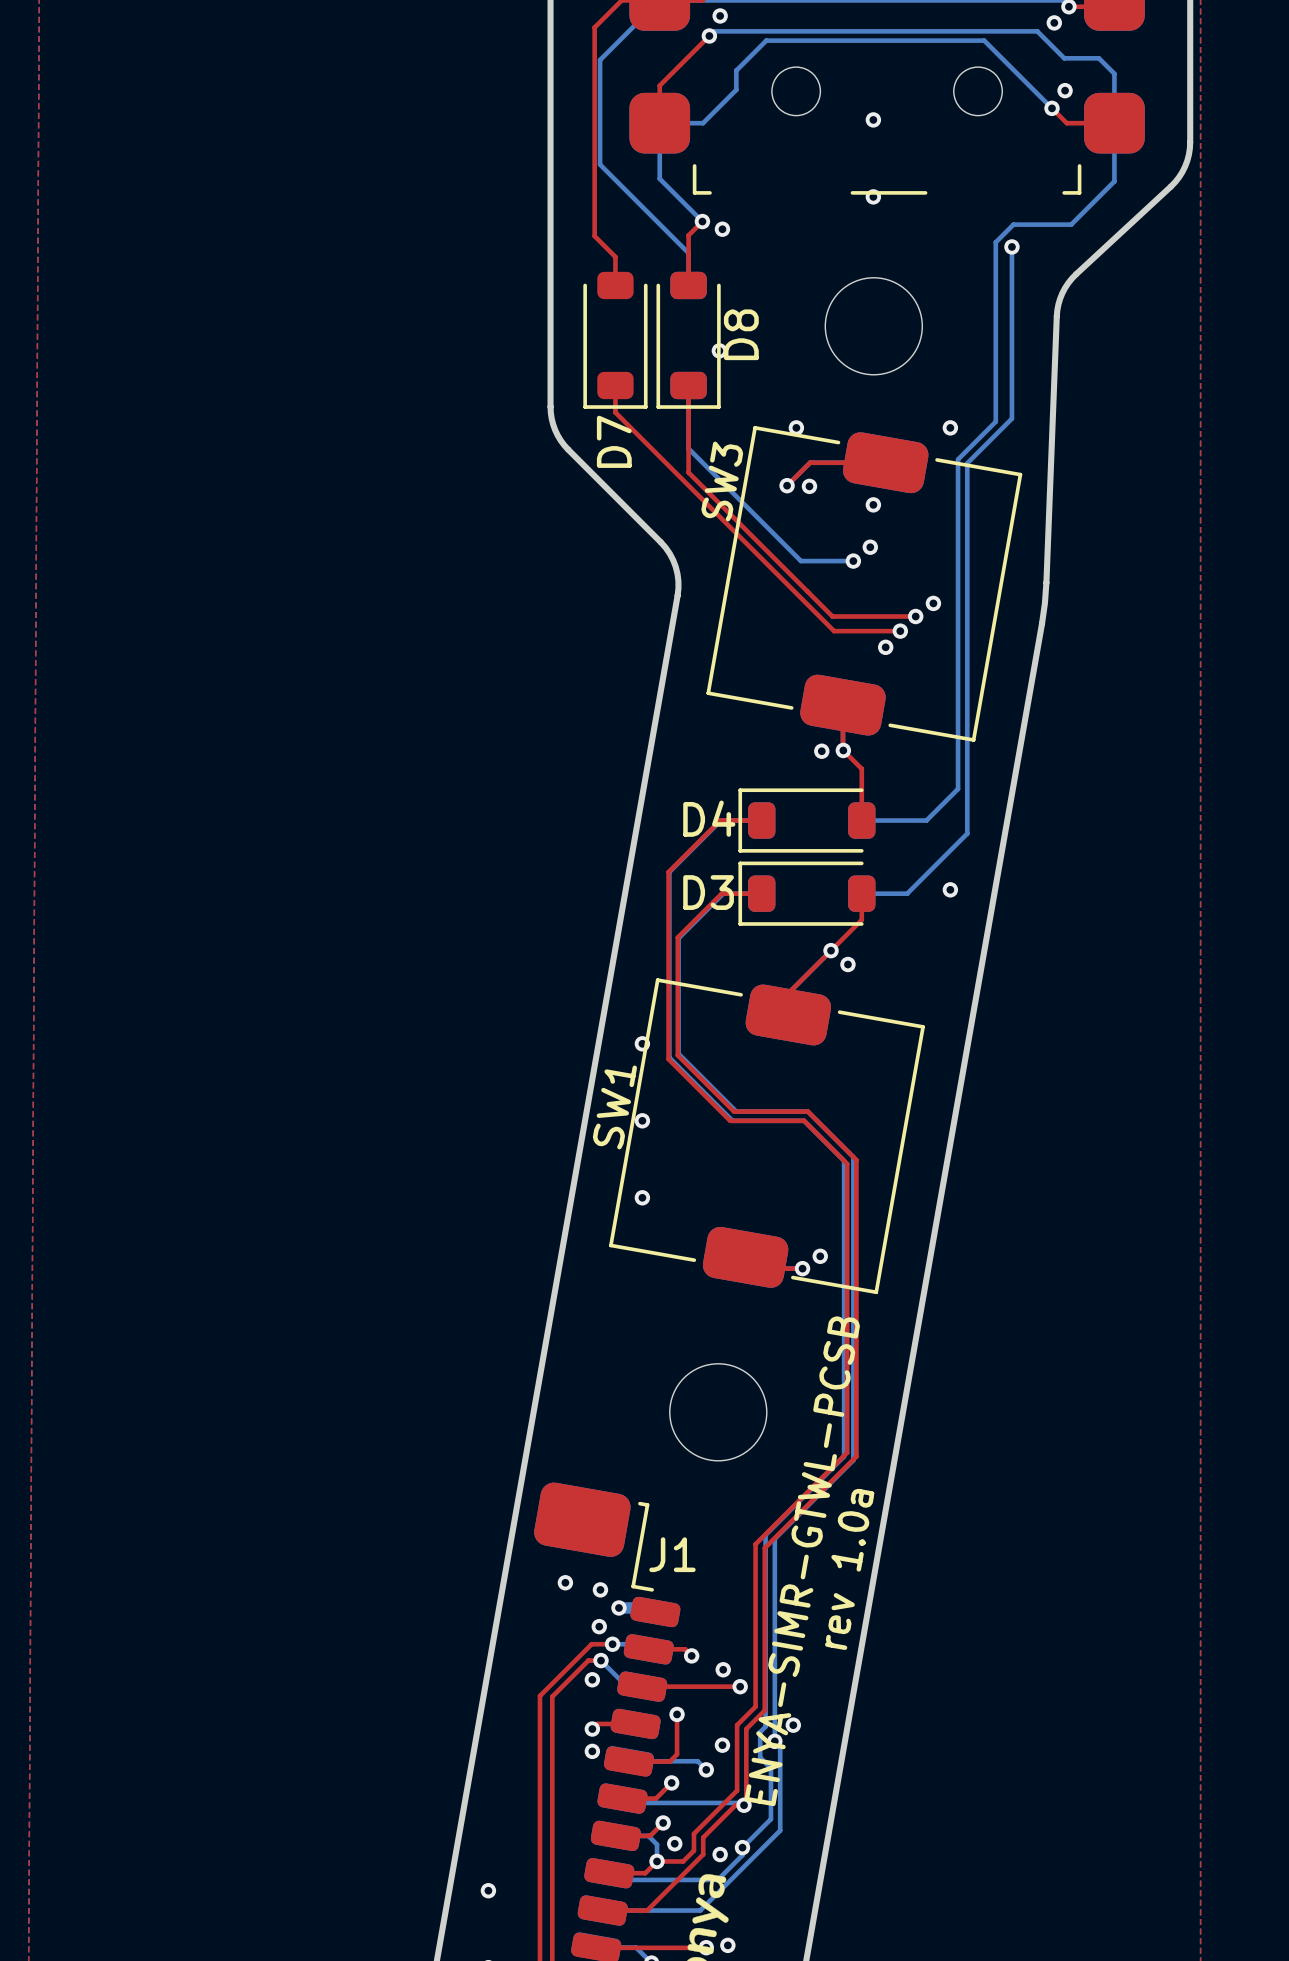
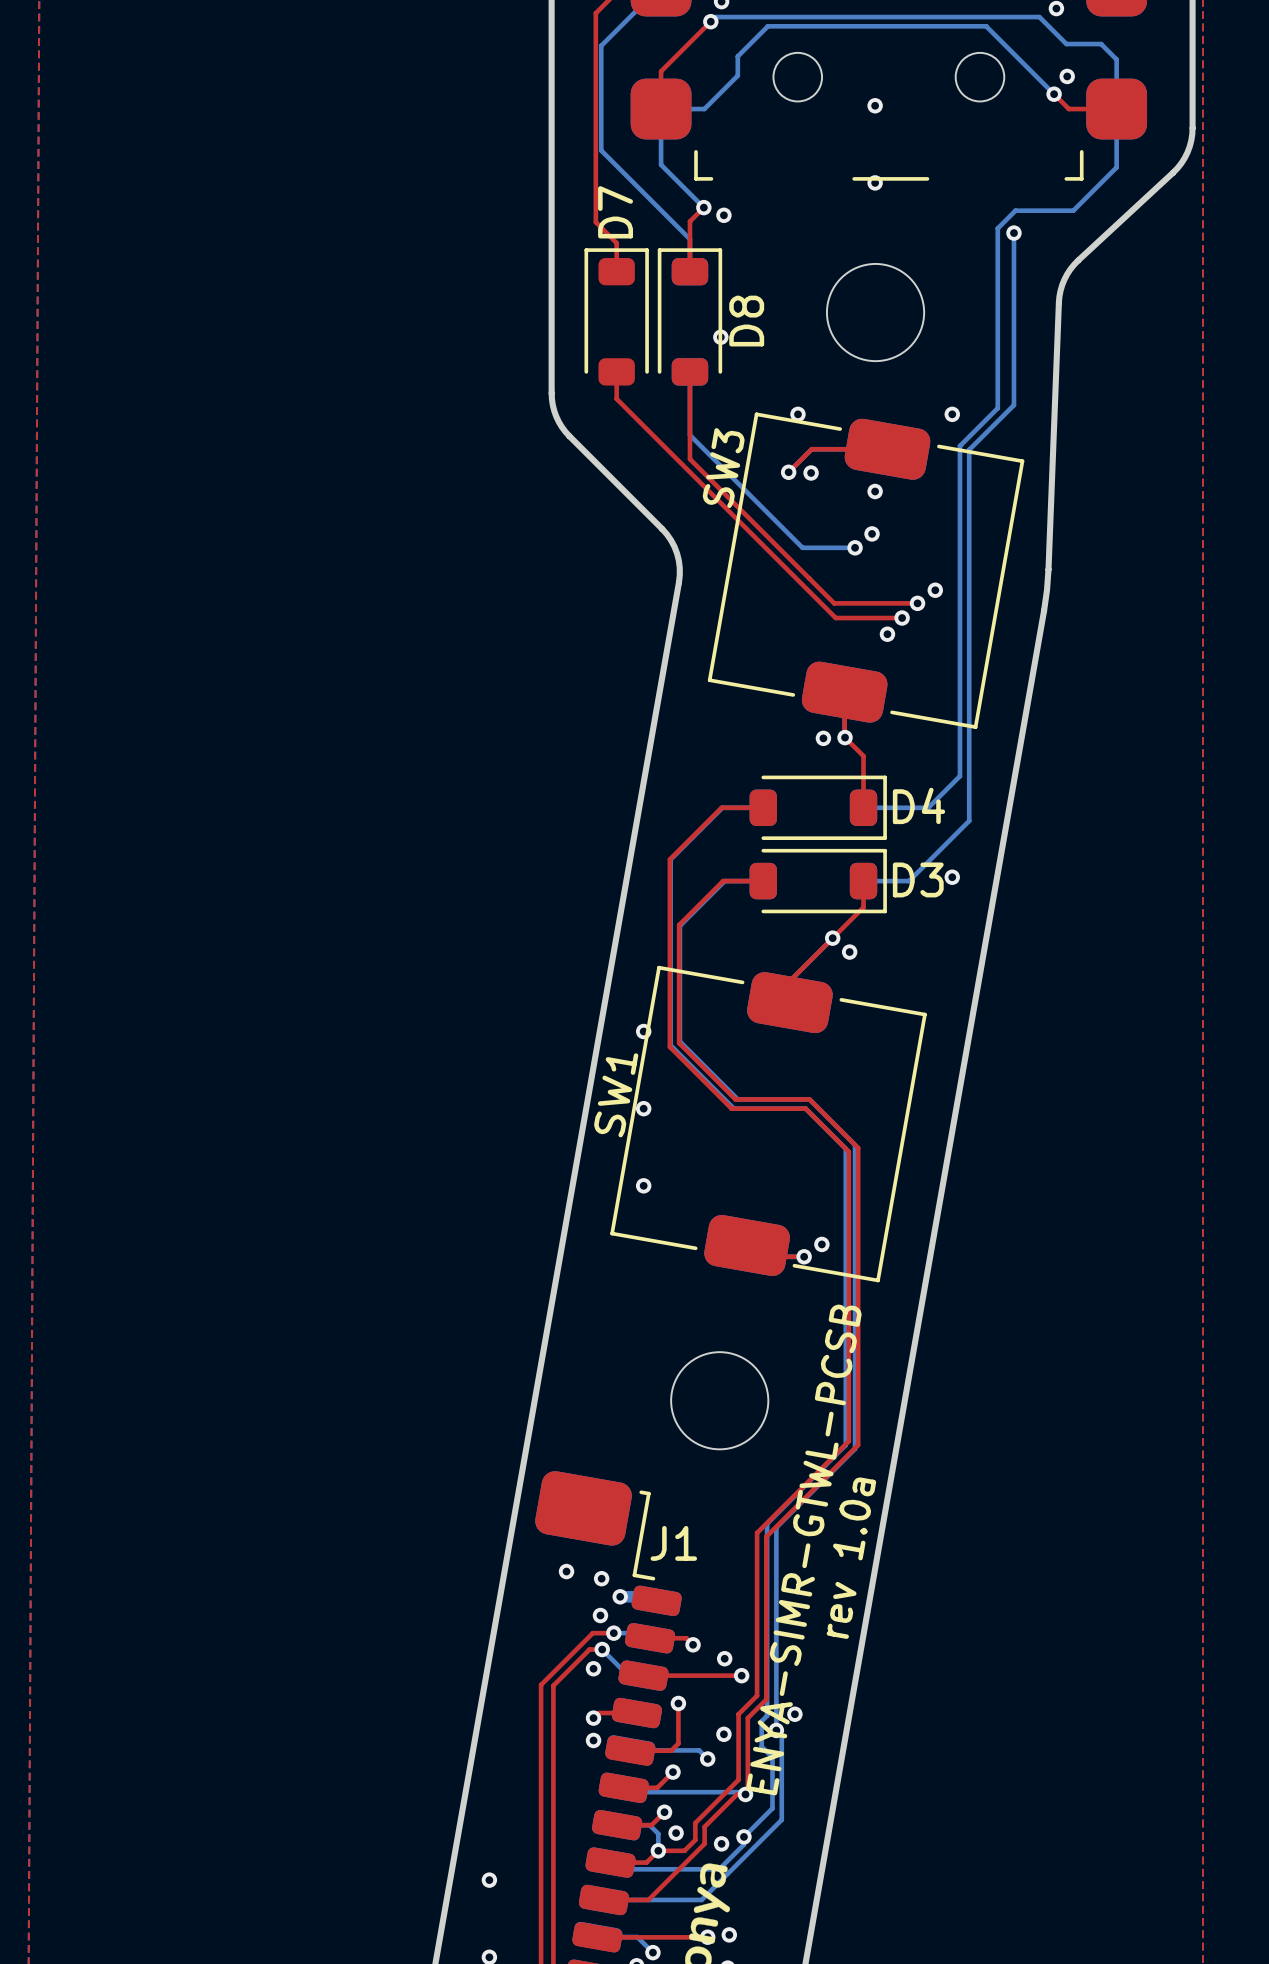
D7 rotation: 0° (615, 340) -> 180° (616, 316)
D8 rotation: 0° (688, 340) -> 180° (689, 316)
D4 rotation: 0° (806, 820) -> 180° (818, 807)
D3 rotation: 0° (806, 893) -> 180° (818, 881)

